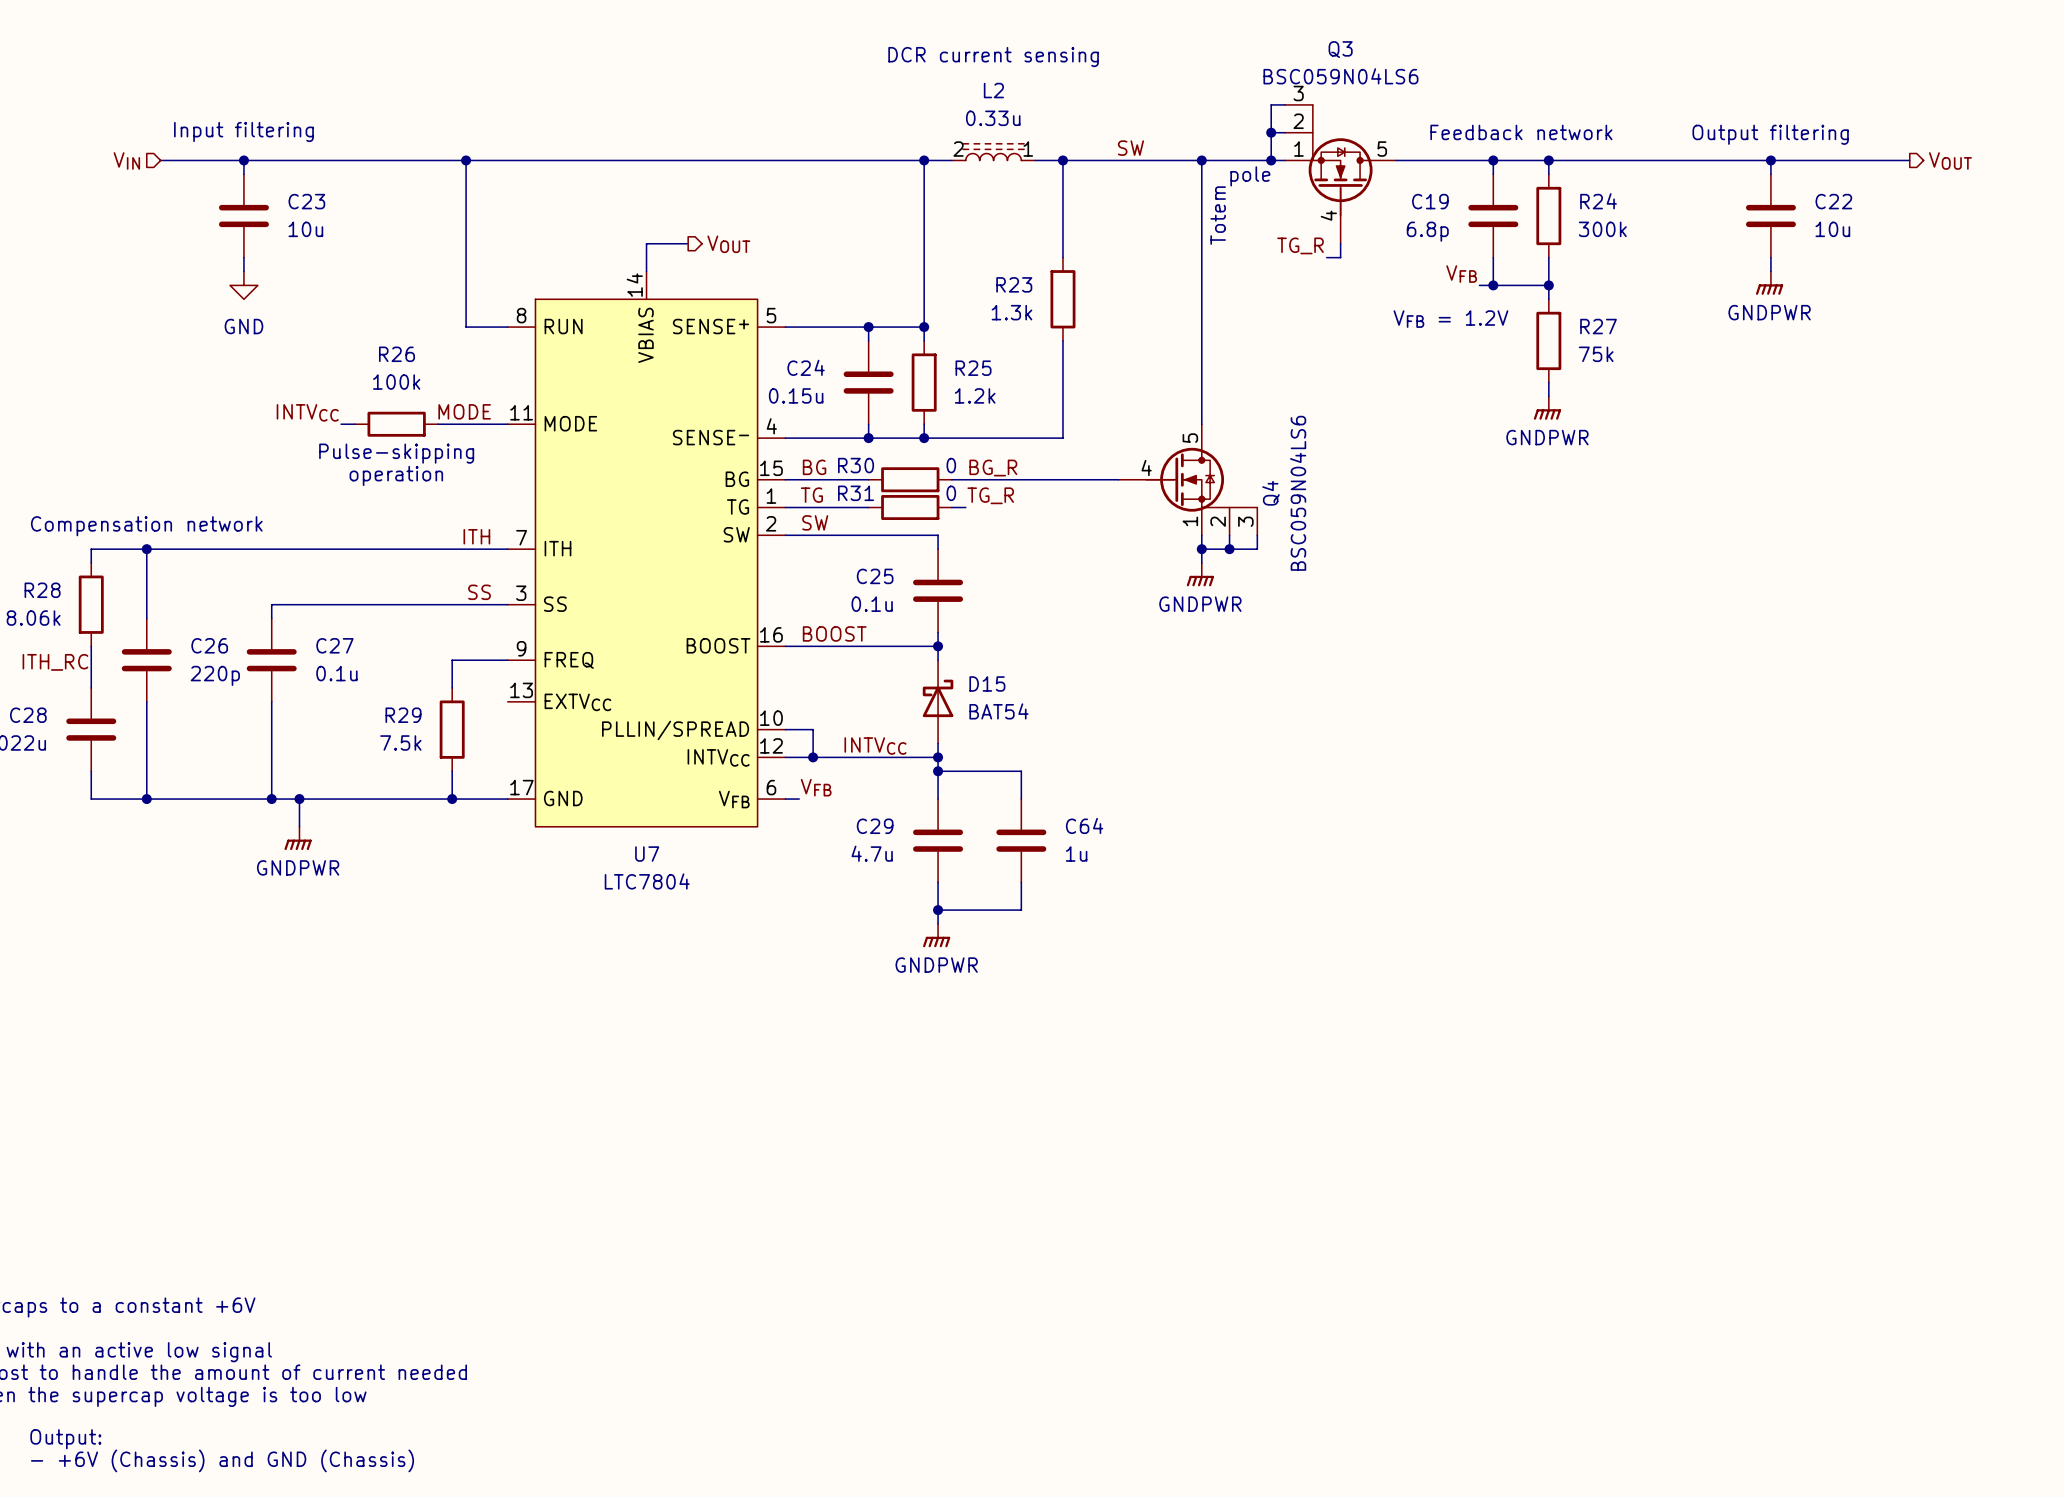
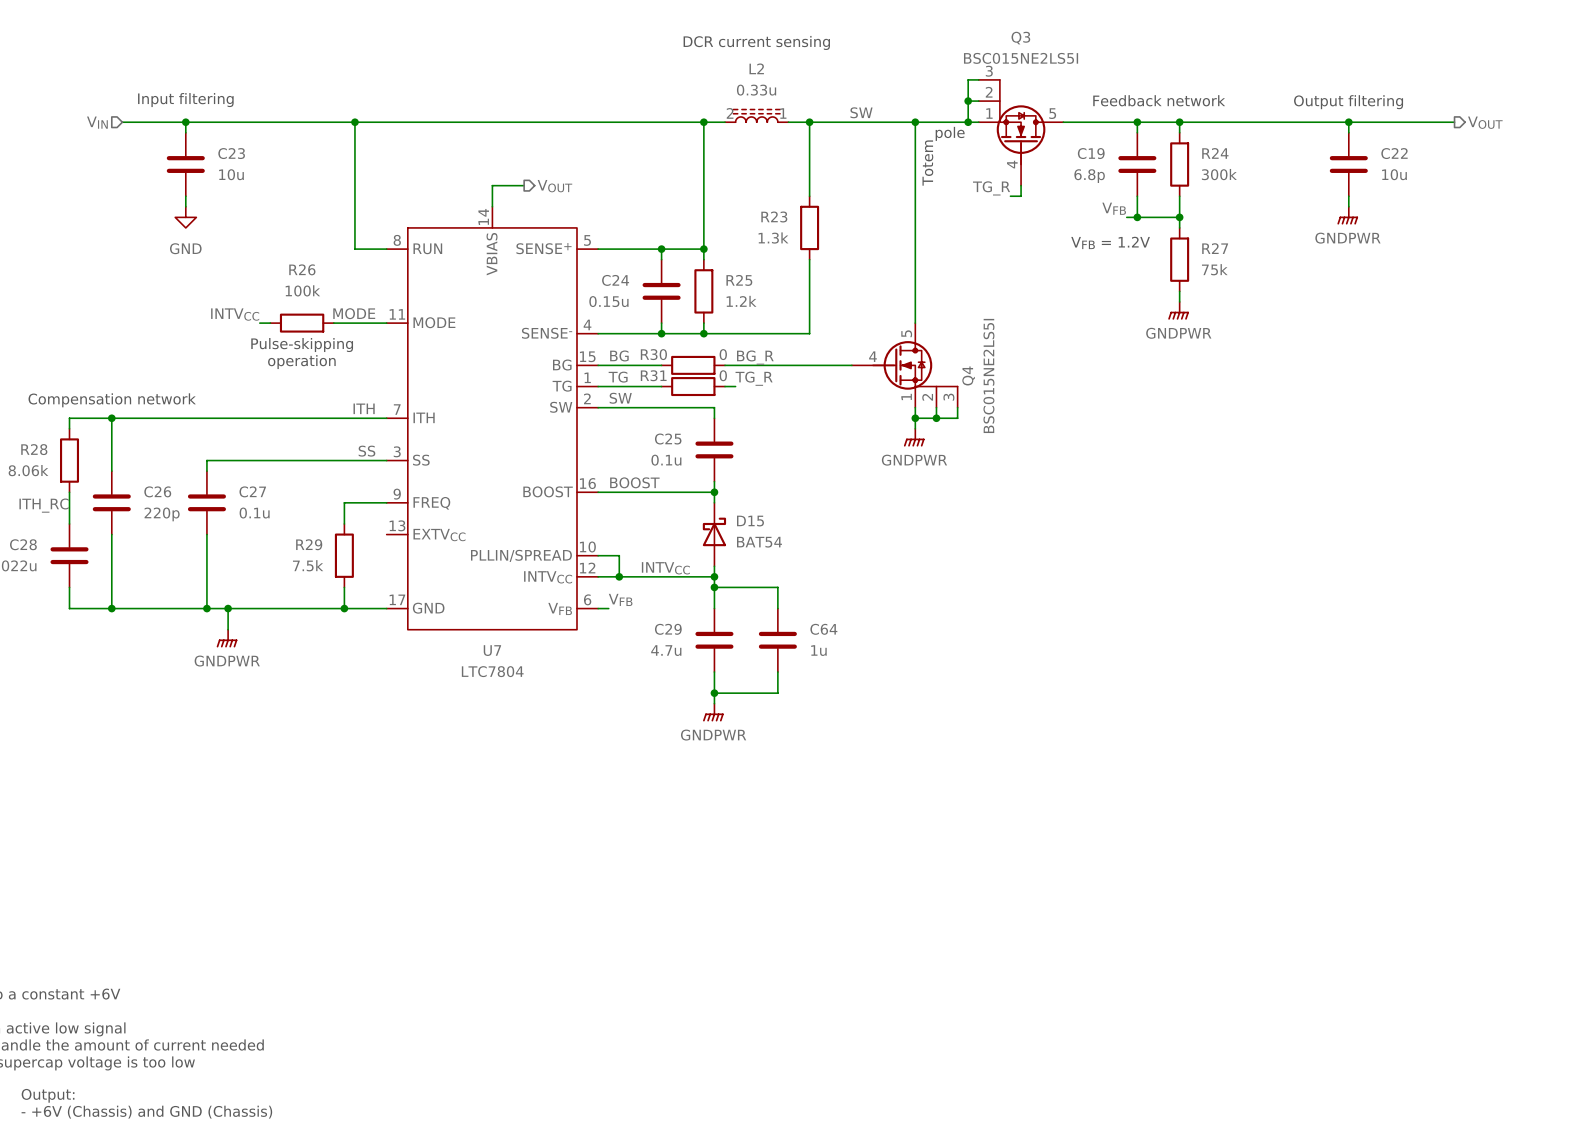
Q3 value: BSC059N04LS6 (1340, 76) -> BSC015NE2LS5I (1021, 58)
Q4 value: BSC059N04LS6 (1298, 493) -> BSC015NE2LS5I (988, 375)

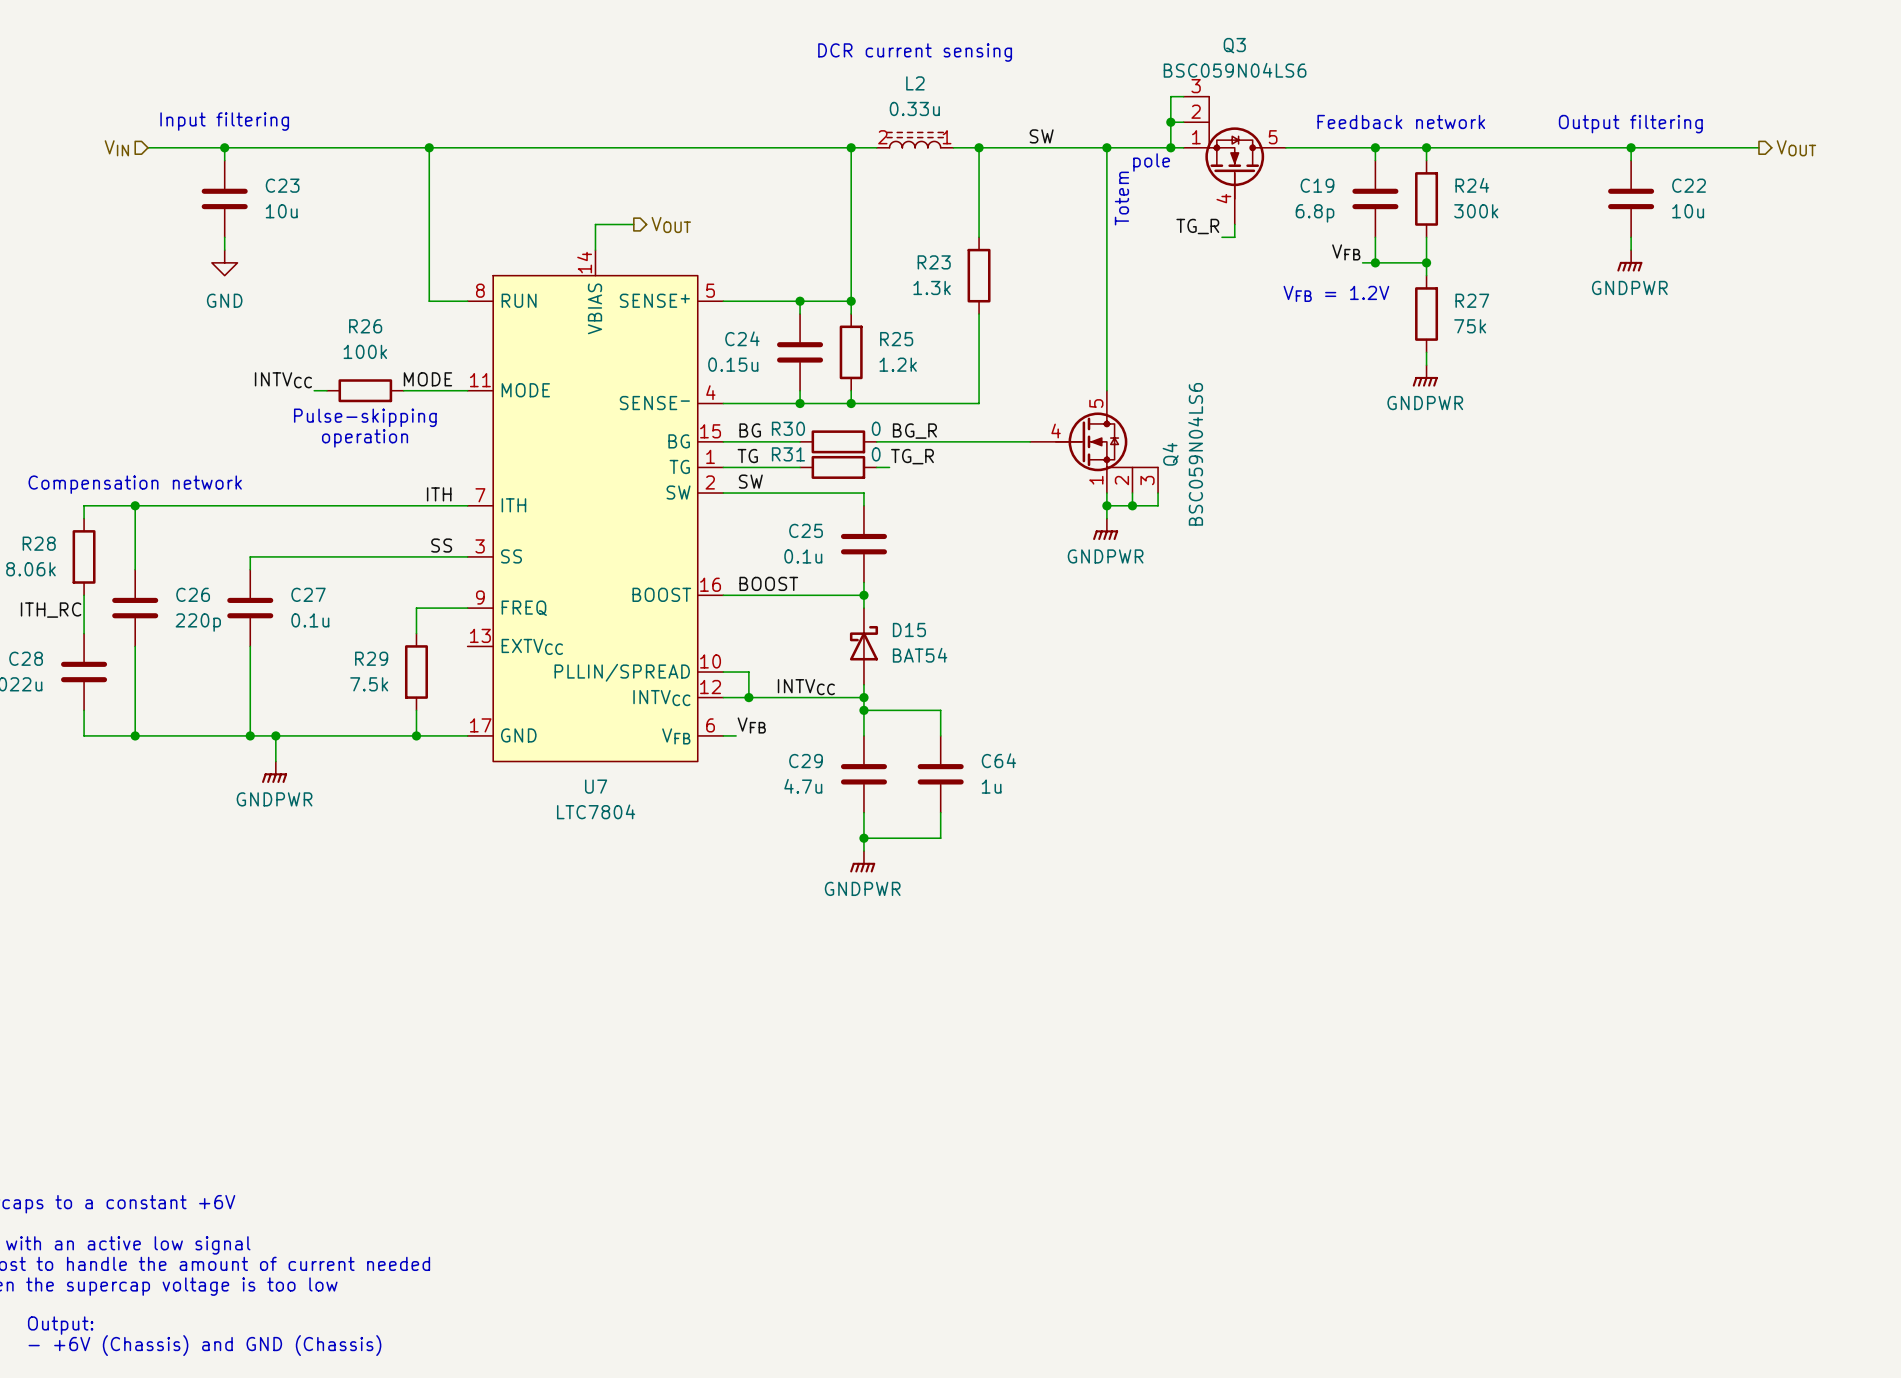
Q3 value: BSC015NE2LS5I (1021, 58) -> BSC059N04LS6 (1235, 70)
Q4 value: BSC015NE2LS5I (988, 375) -> BSC059N04LS6 (1195, 454)

